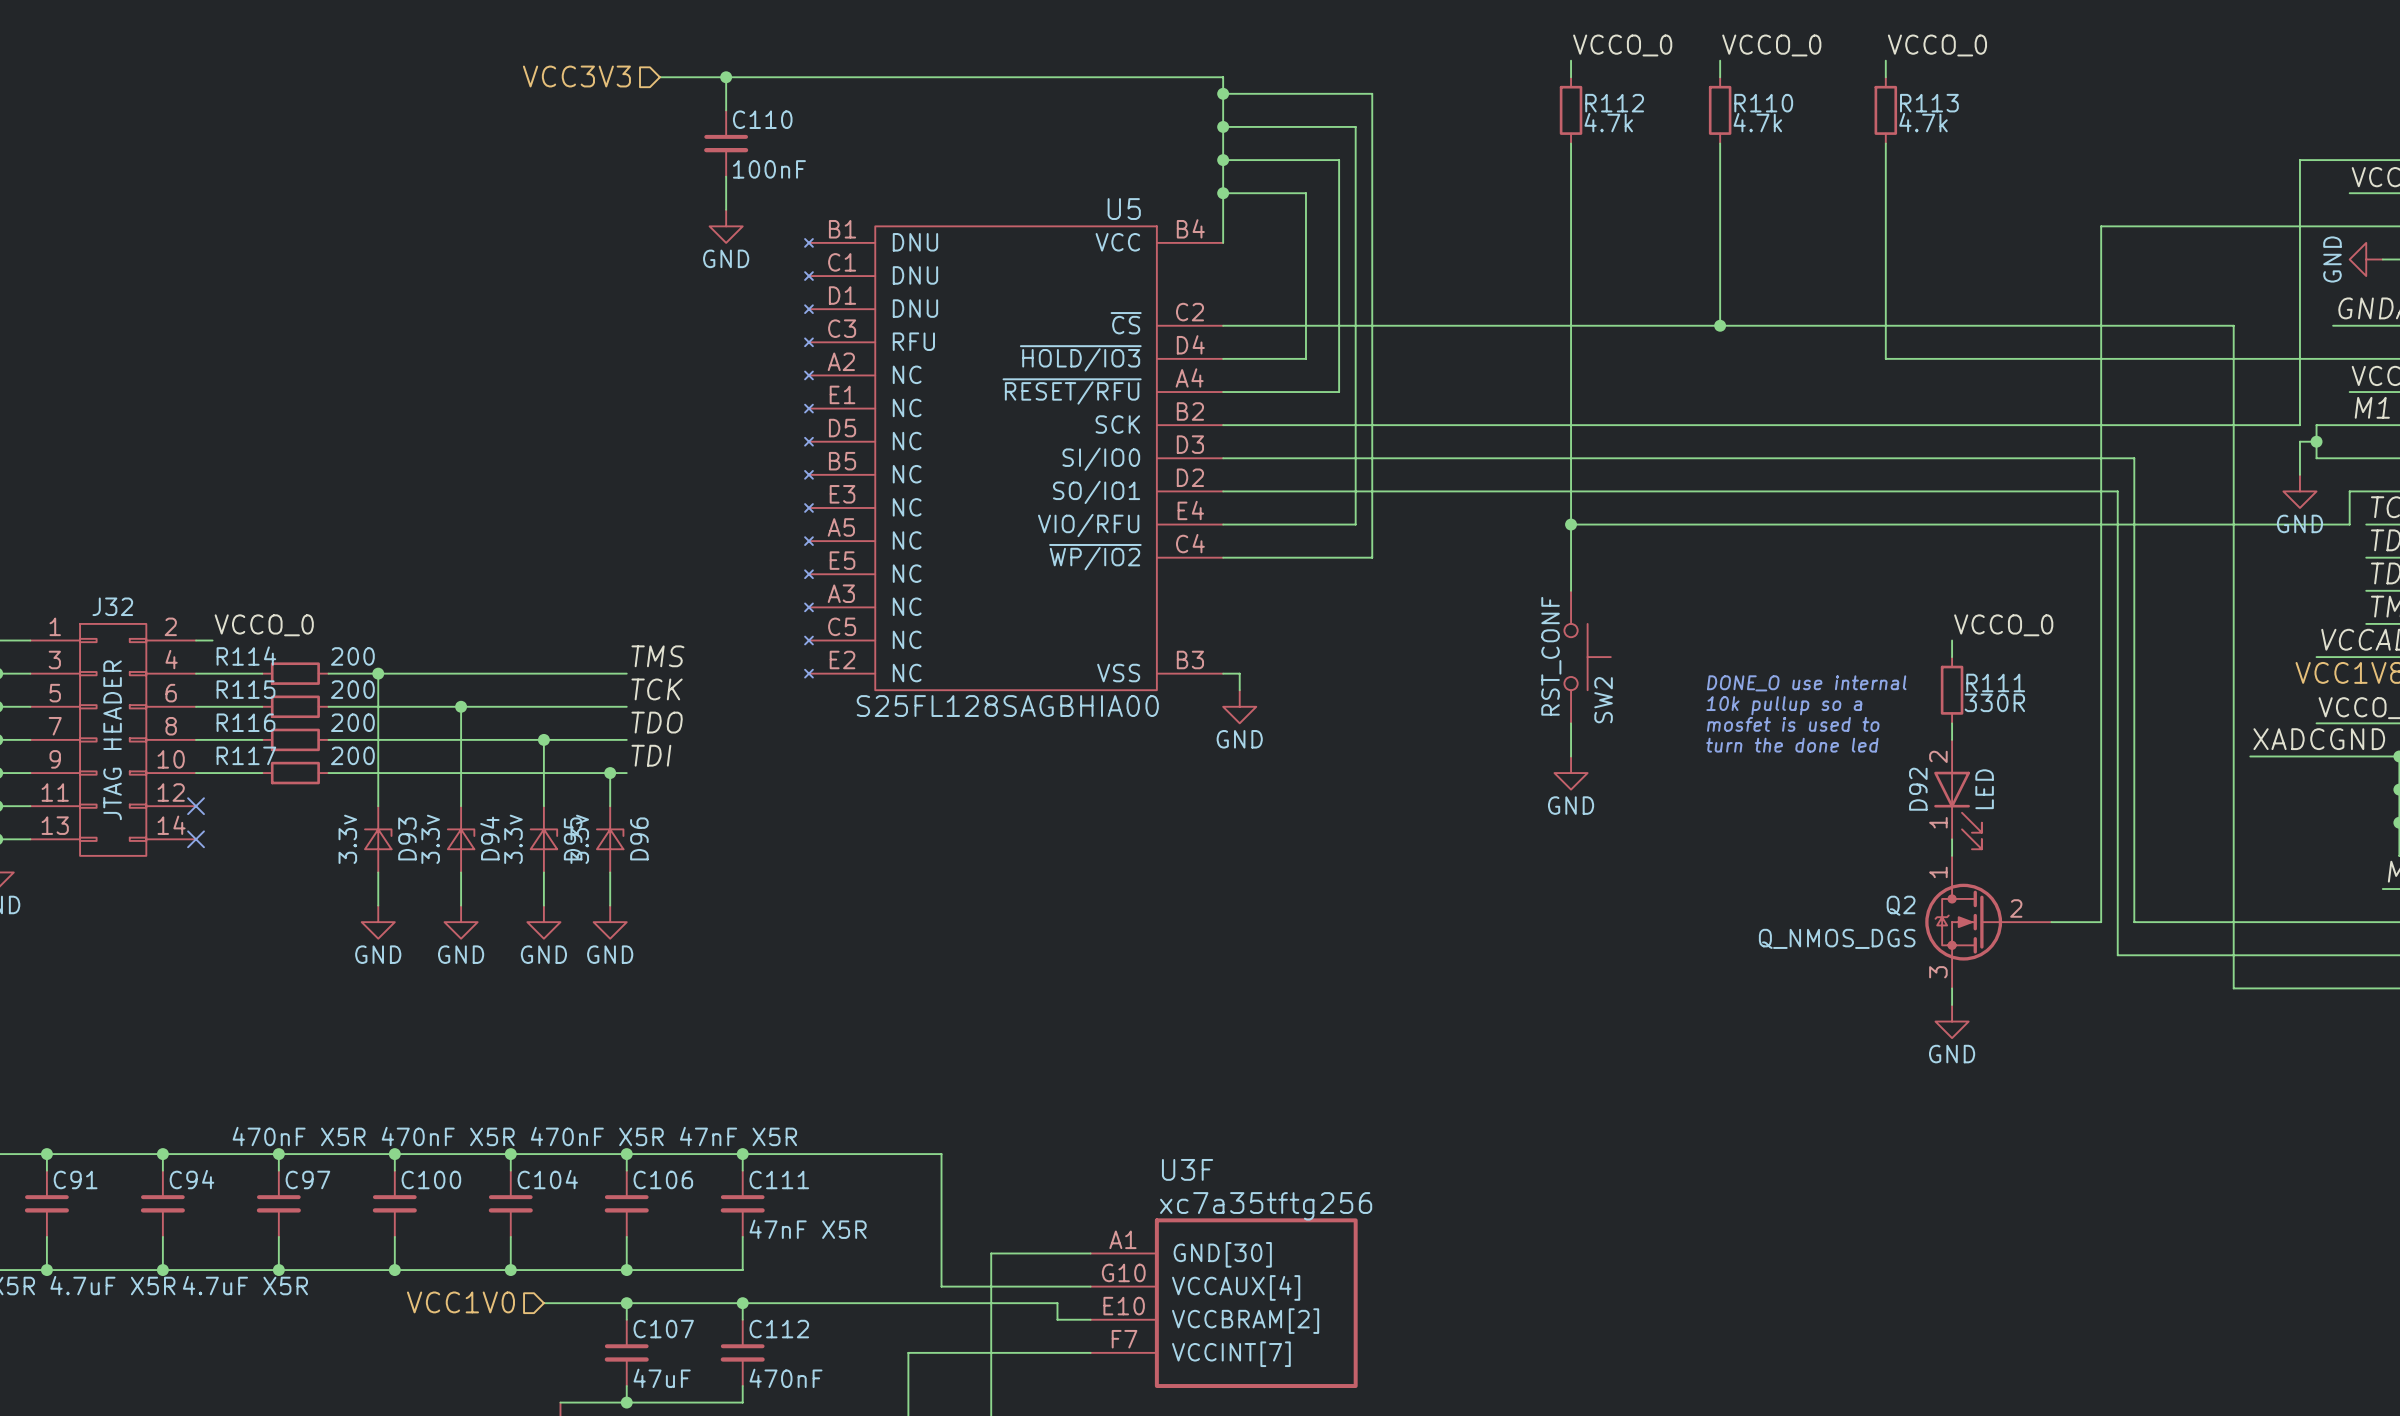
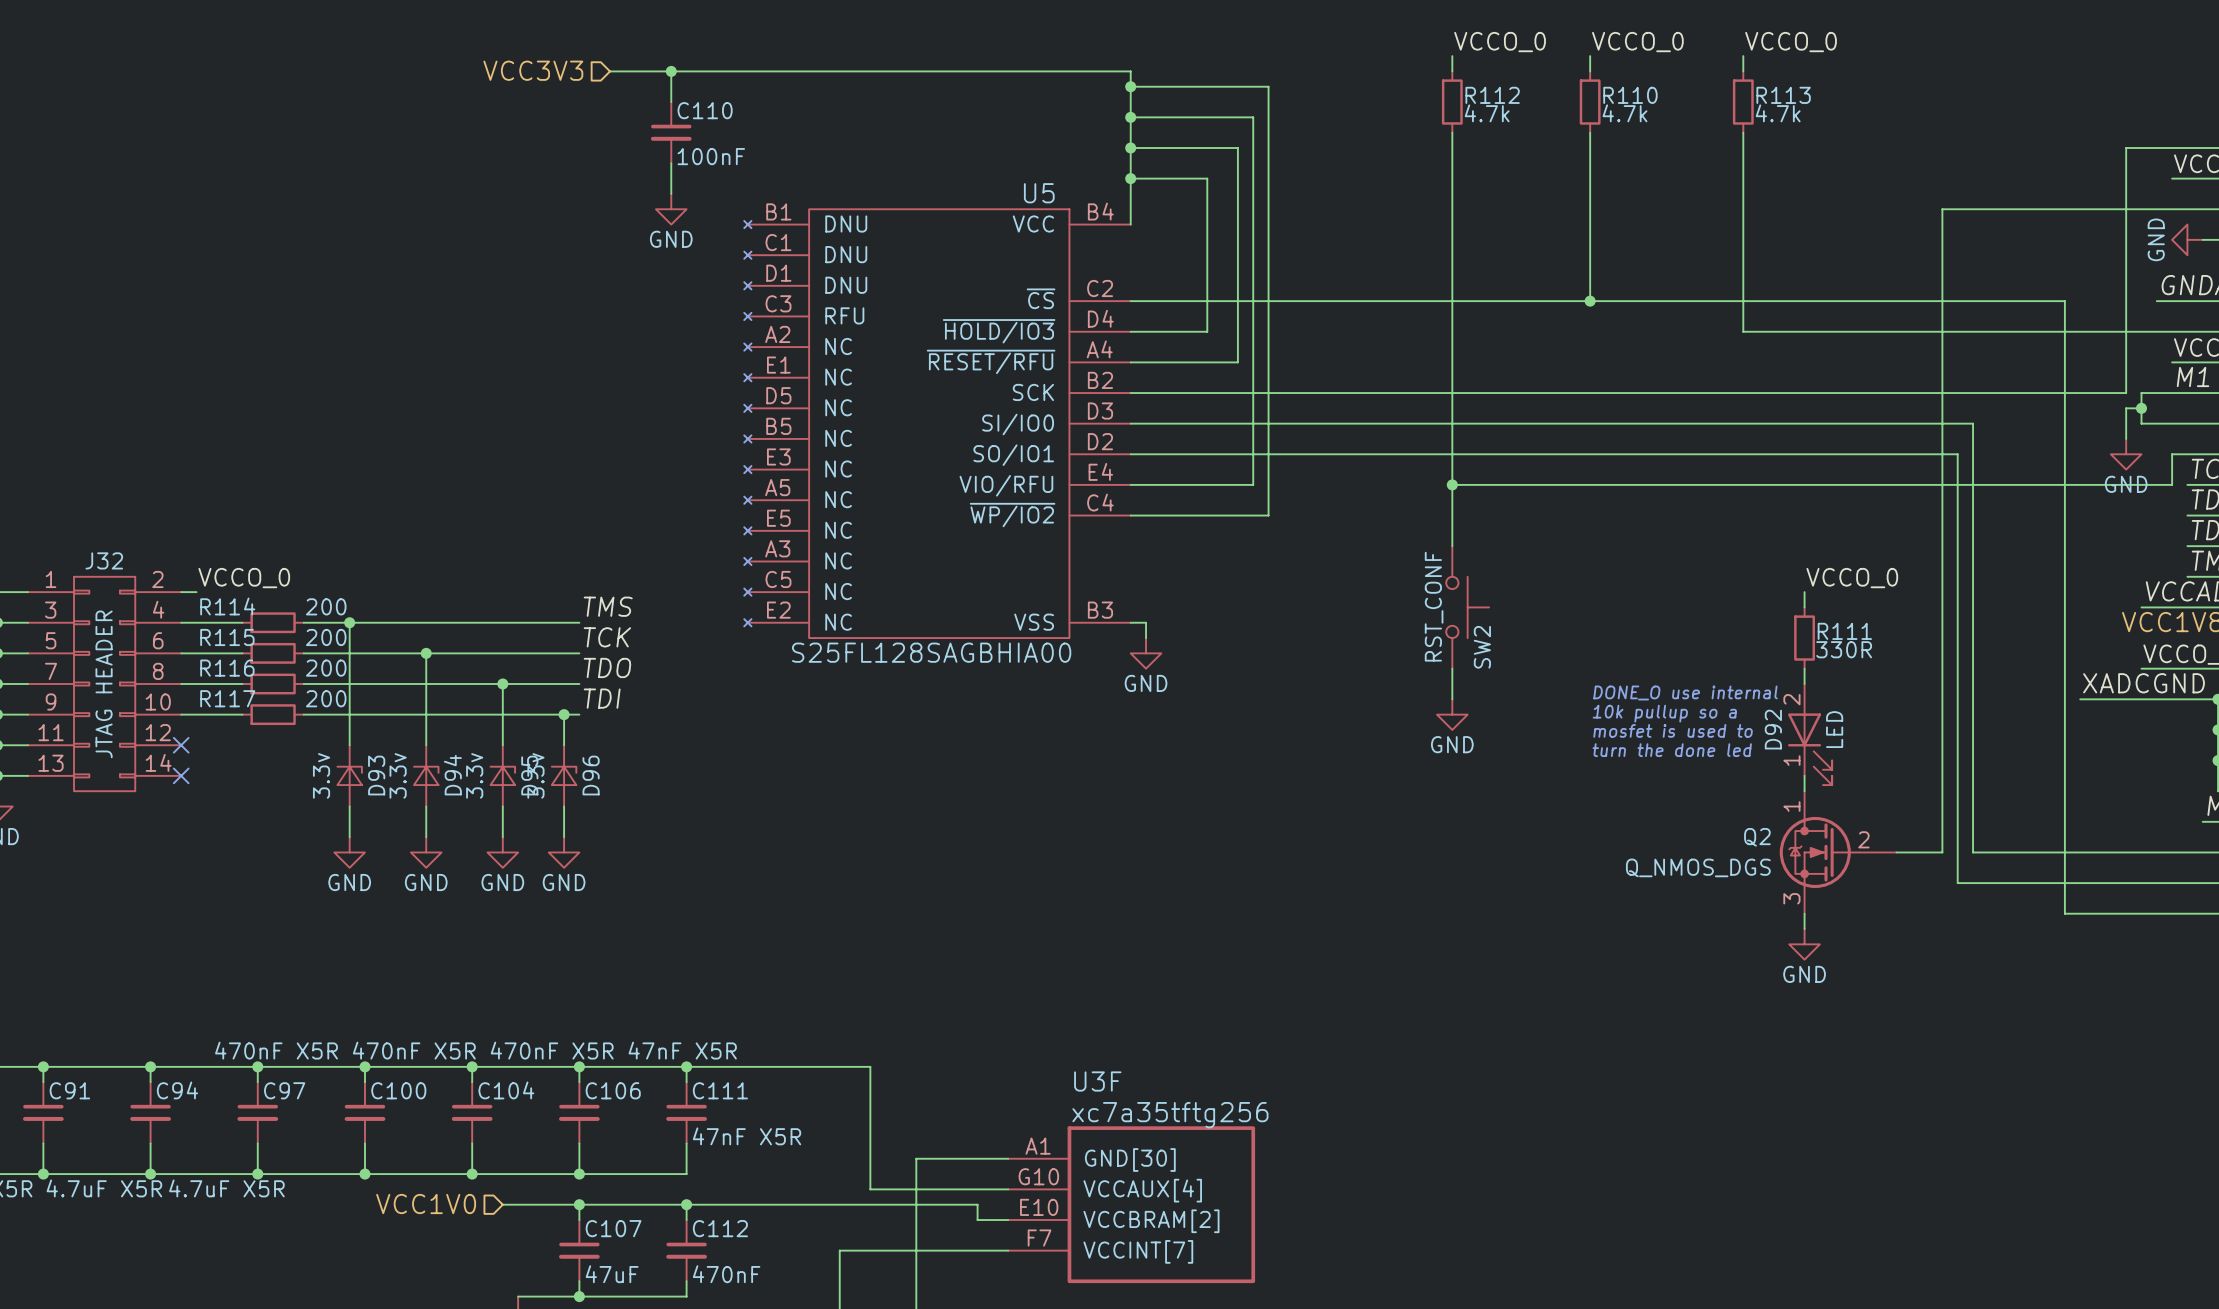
text position: DONE_O use internal (1806, 683) -> DONE_O use internal (1685, 693)
text position: 10k pullup so a (1784, 705) -> 10k pullup so a (1664, 713)
text position: mosfet is used to (1793, 724) -> mosfet is used to (1673, 730)
text position: turn the done led (1792, 745) -> turn the done led (1672, 750)

